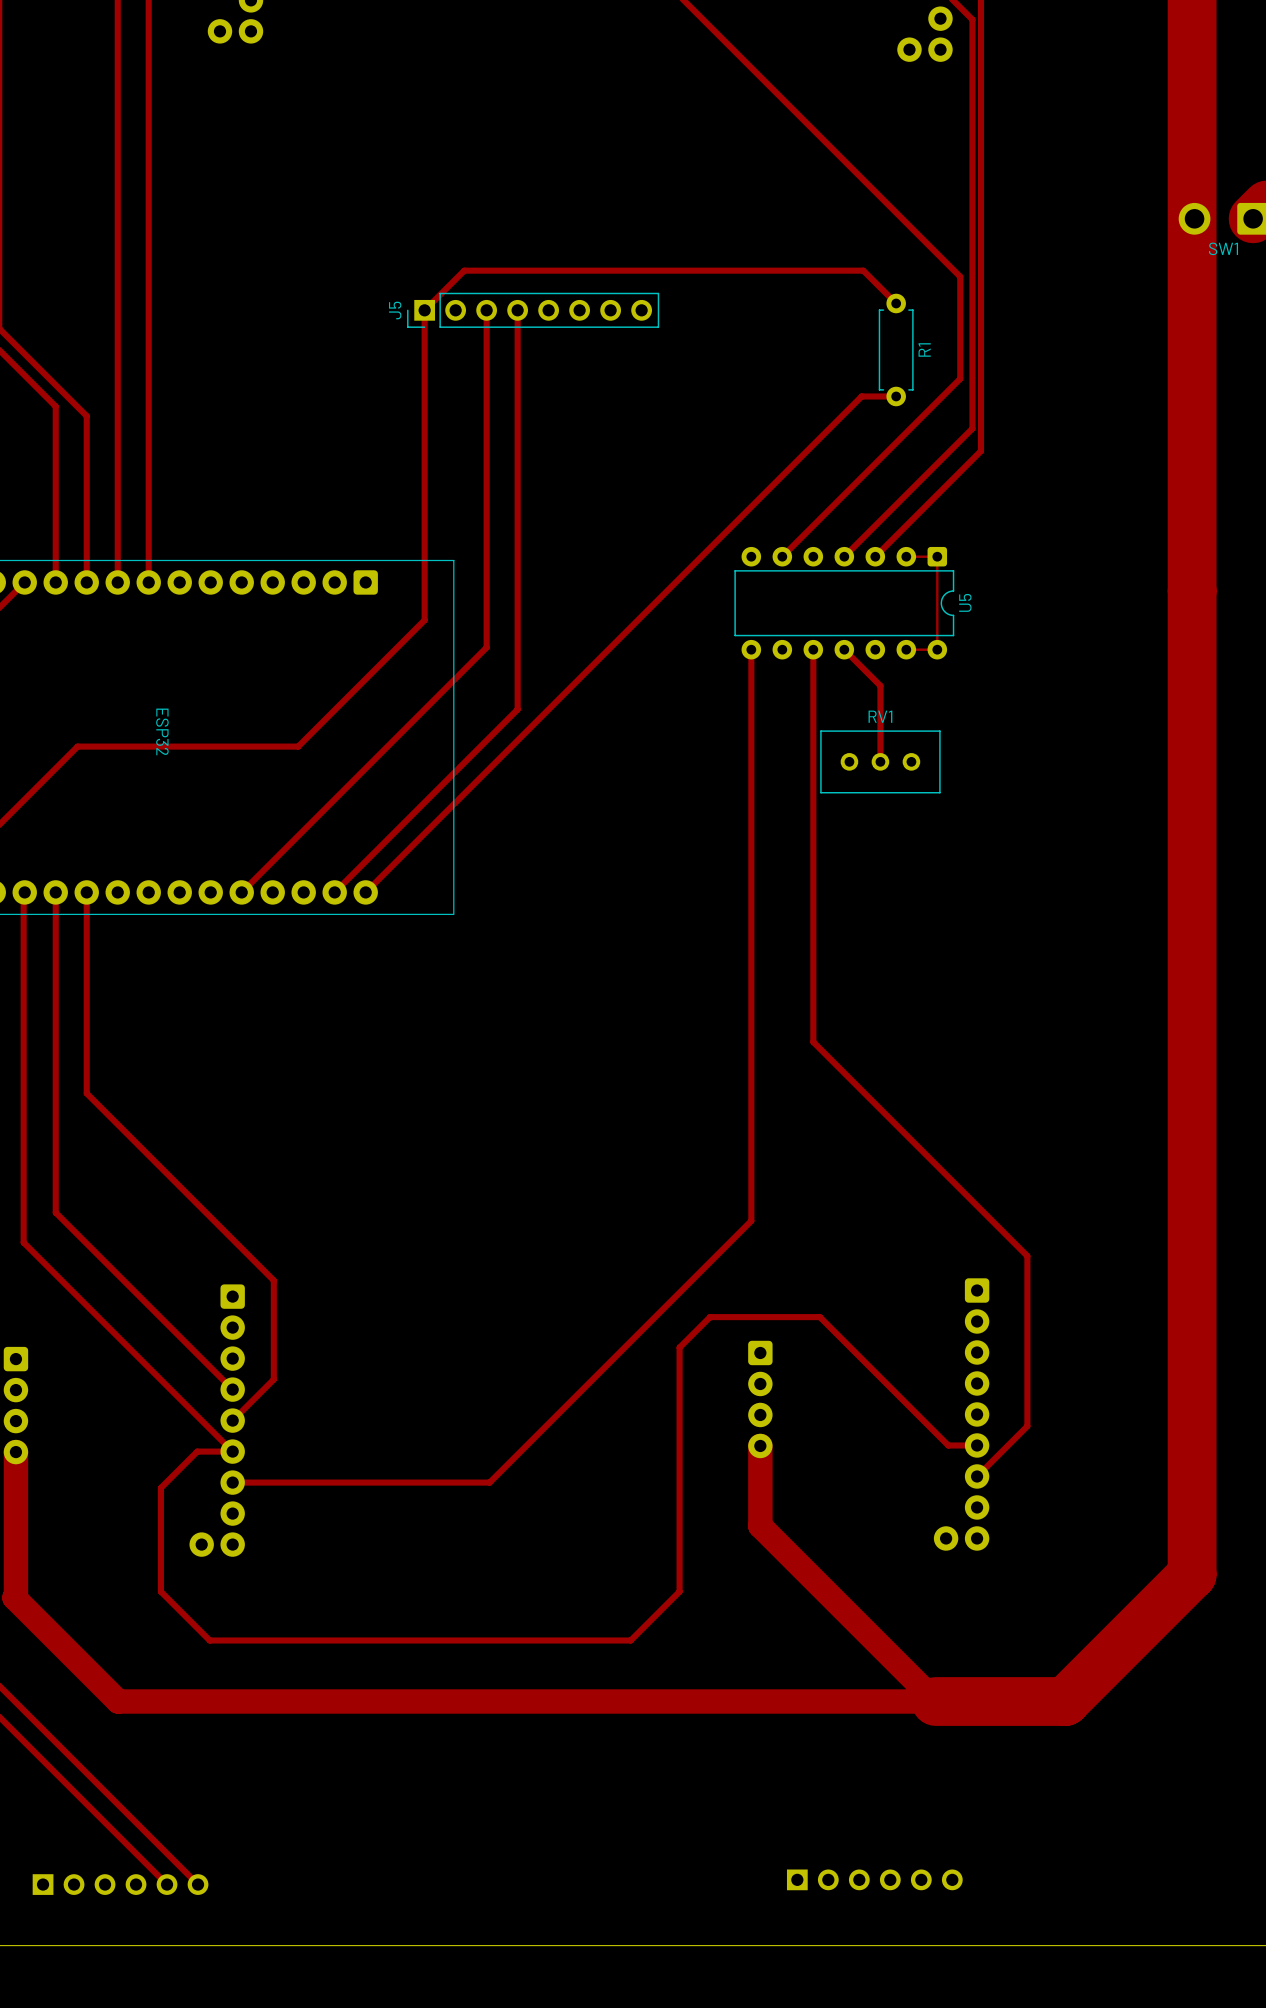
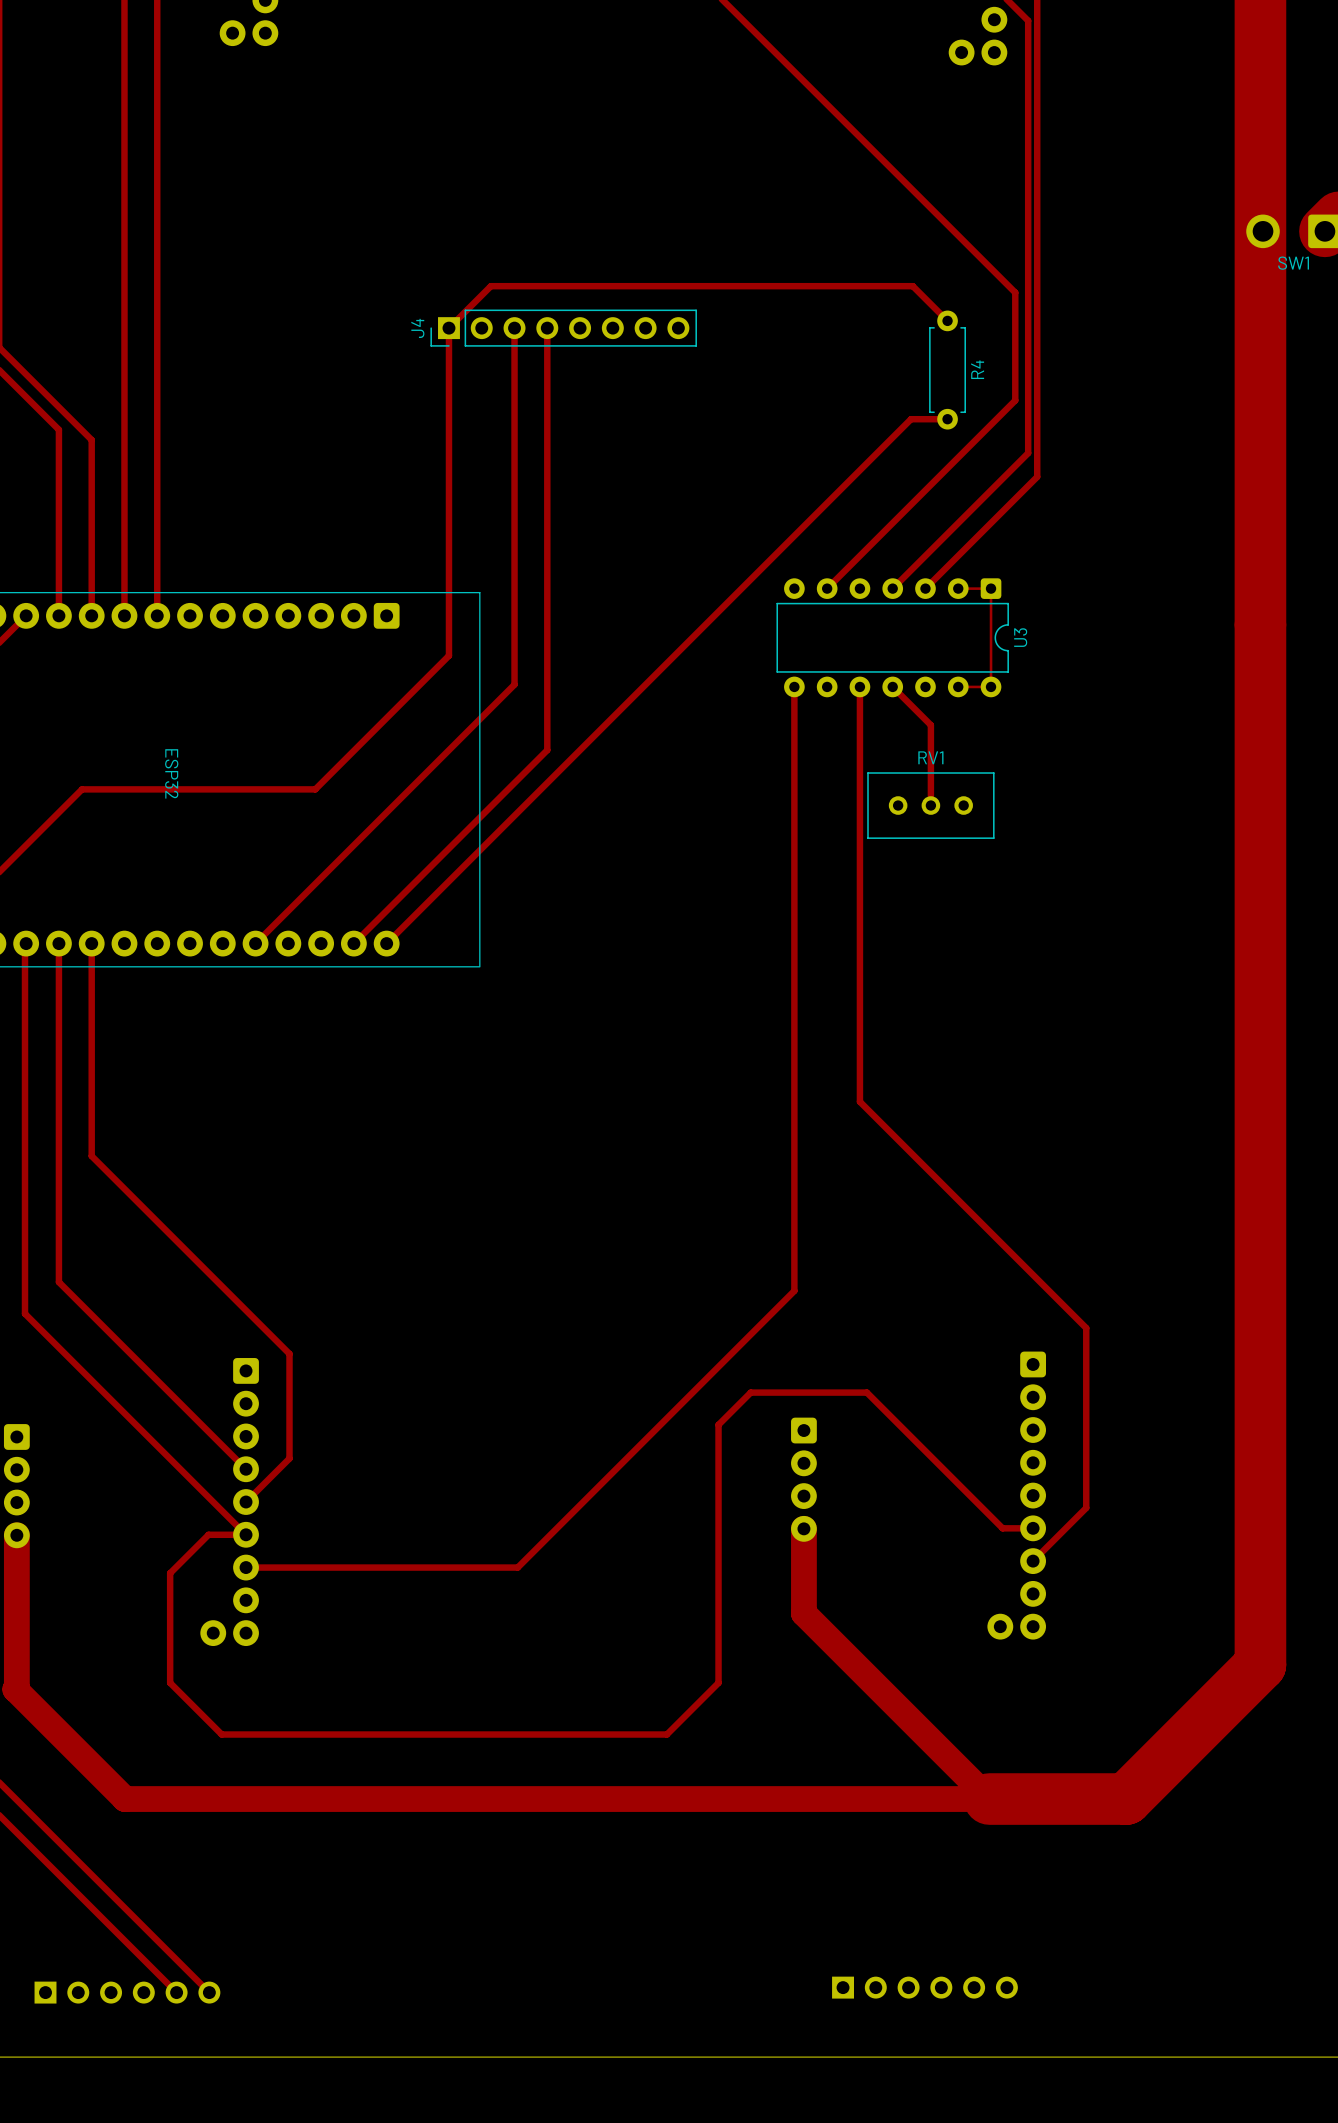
J5 name: J5 (395, 310) -> J4 (417, 328)
R1 name: R1 (924, 349) -> R4 (977, 369)
U5 name: U5 (965, 602) -> U3 (1020, 637)

